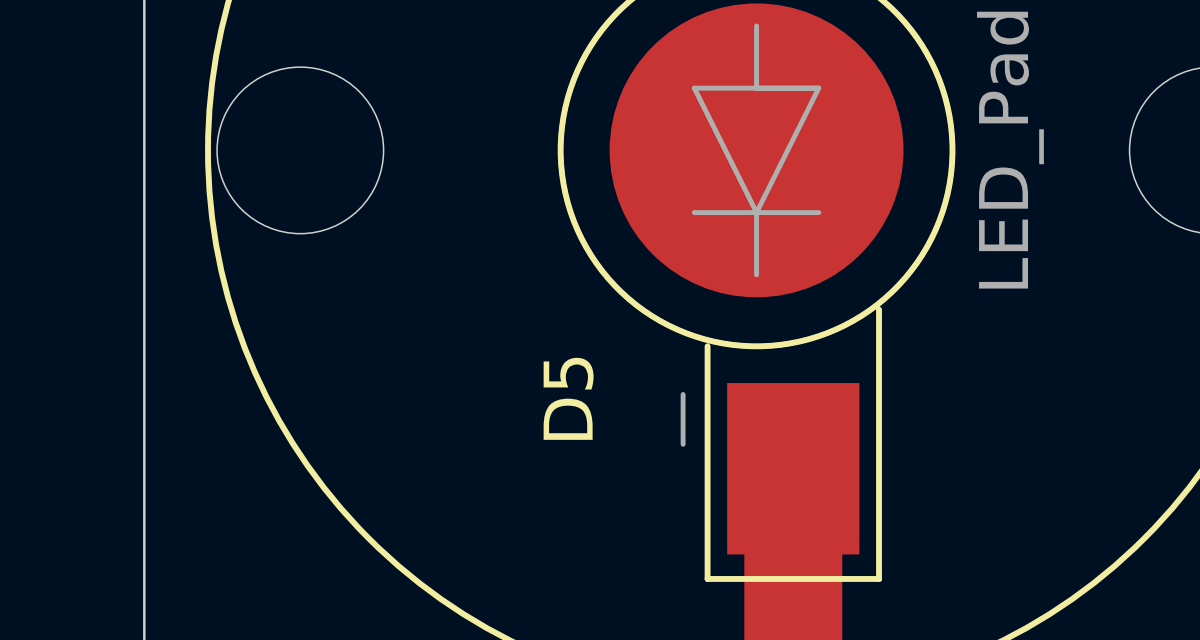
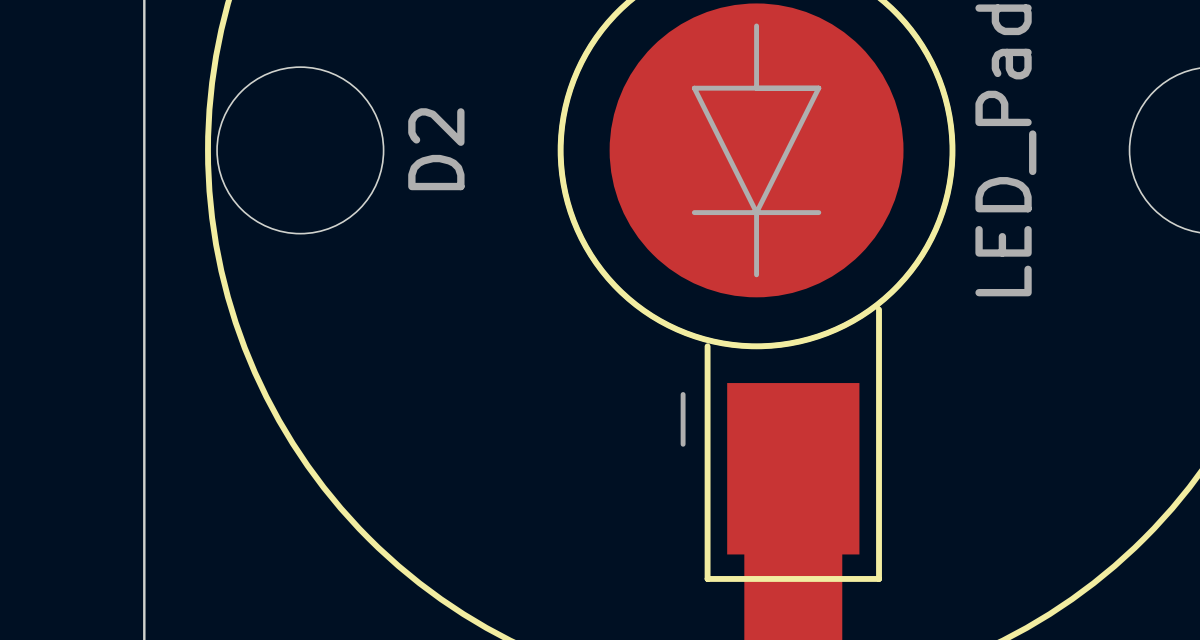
D5 name: D5 (568, 398) -> D2 (436, 149)

